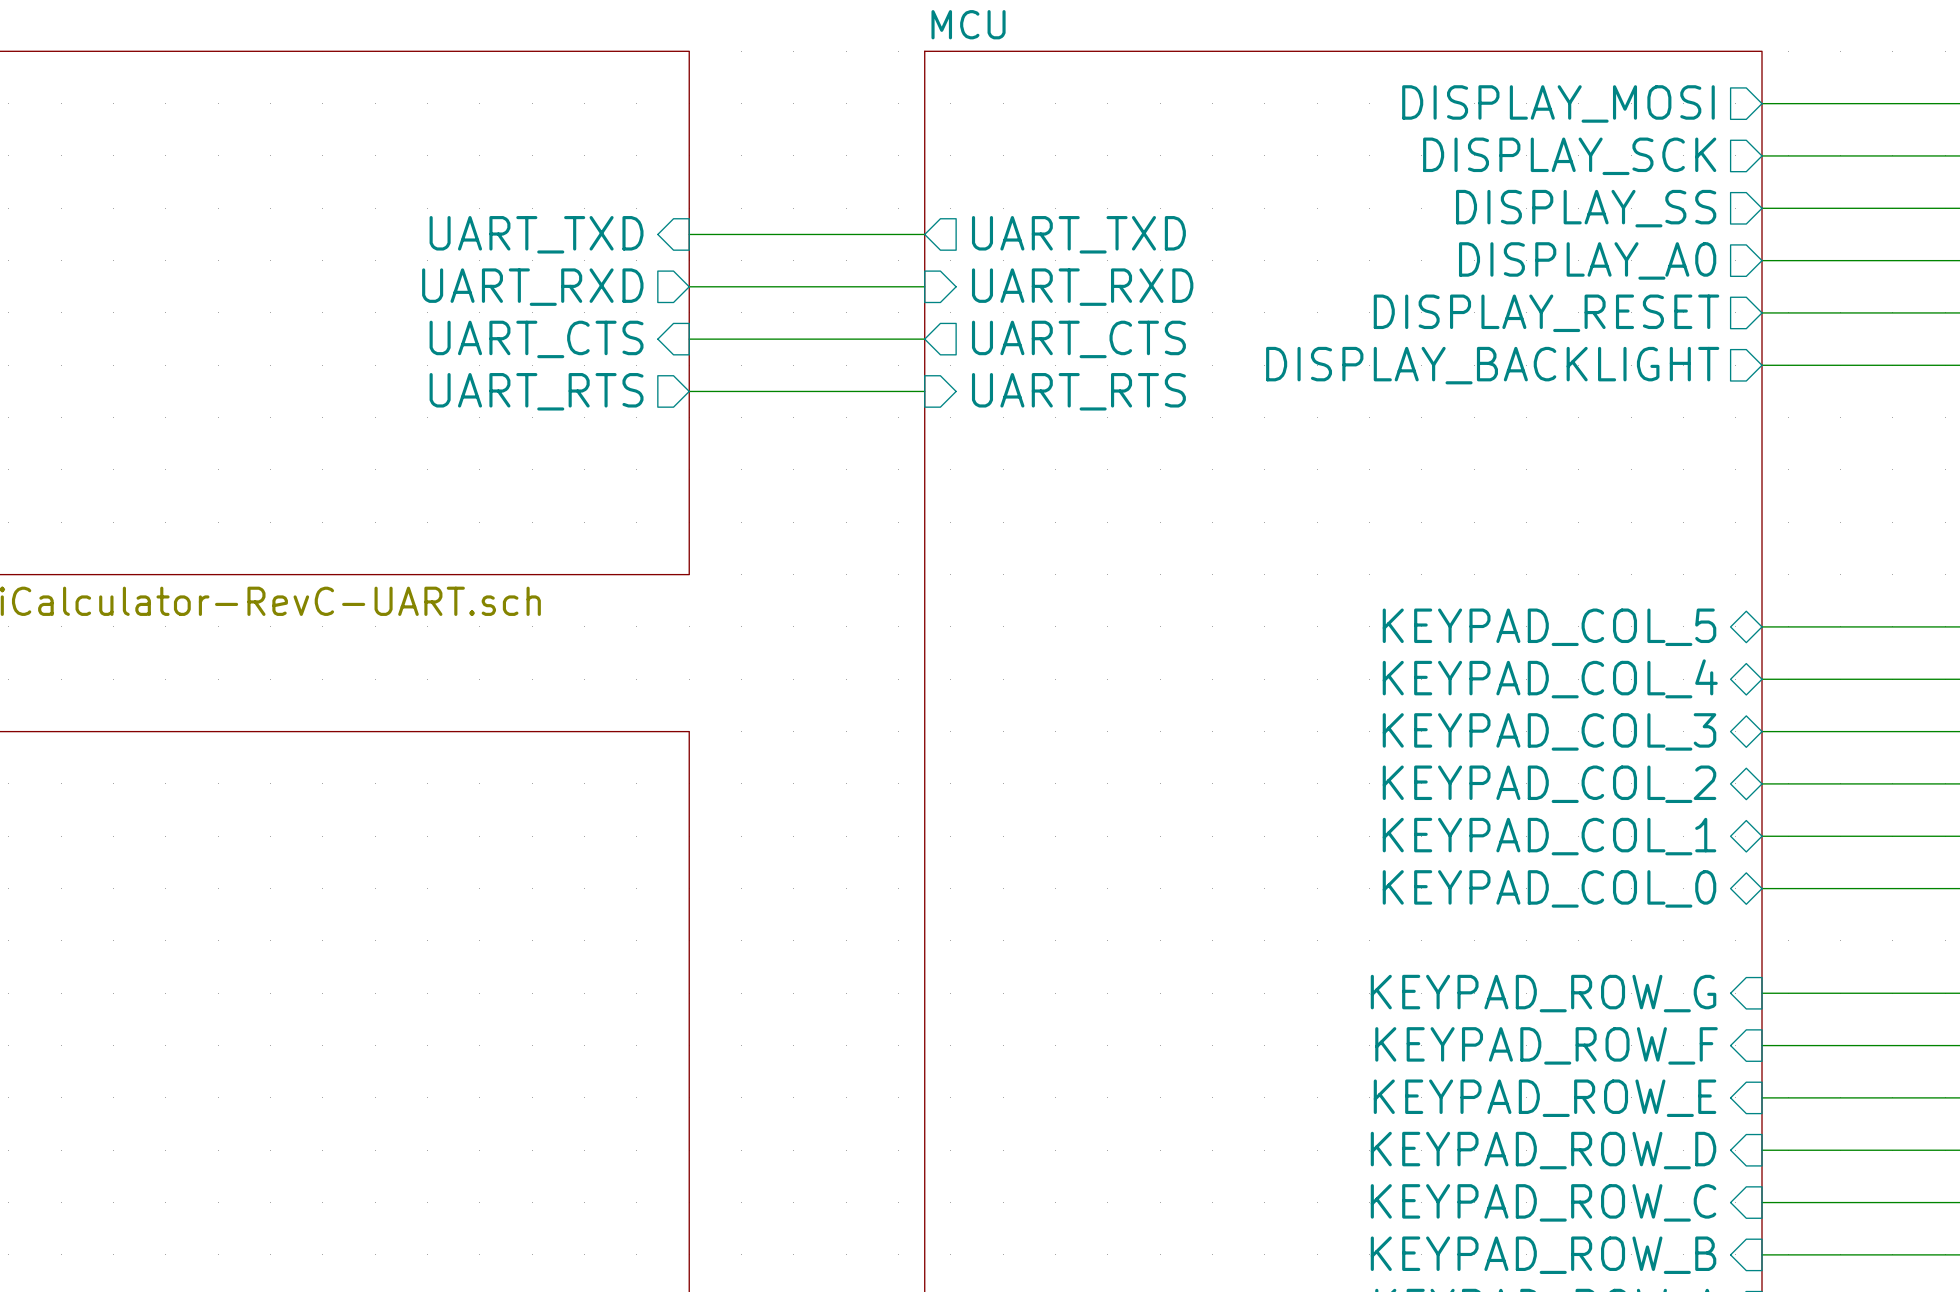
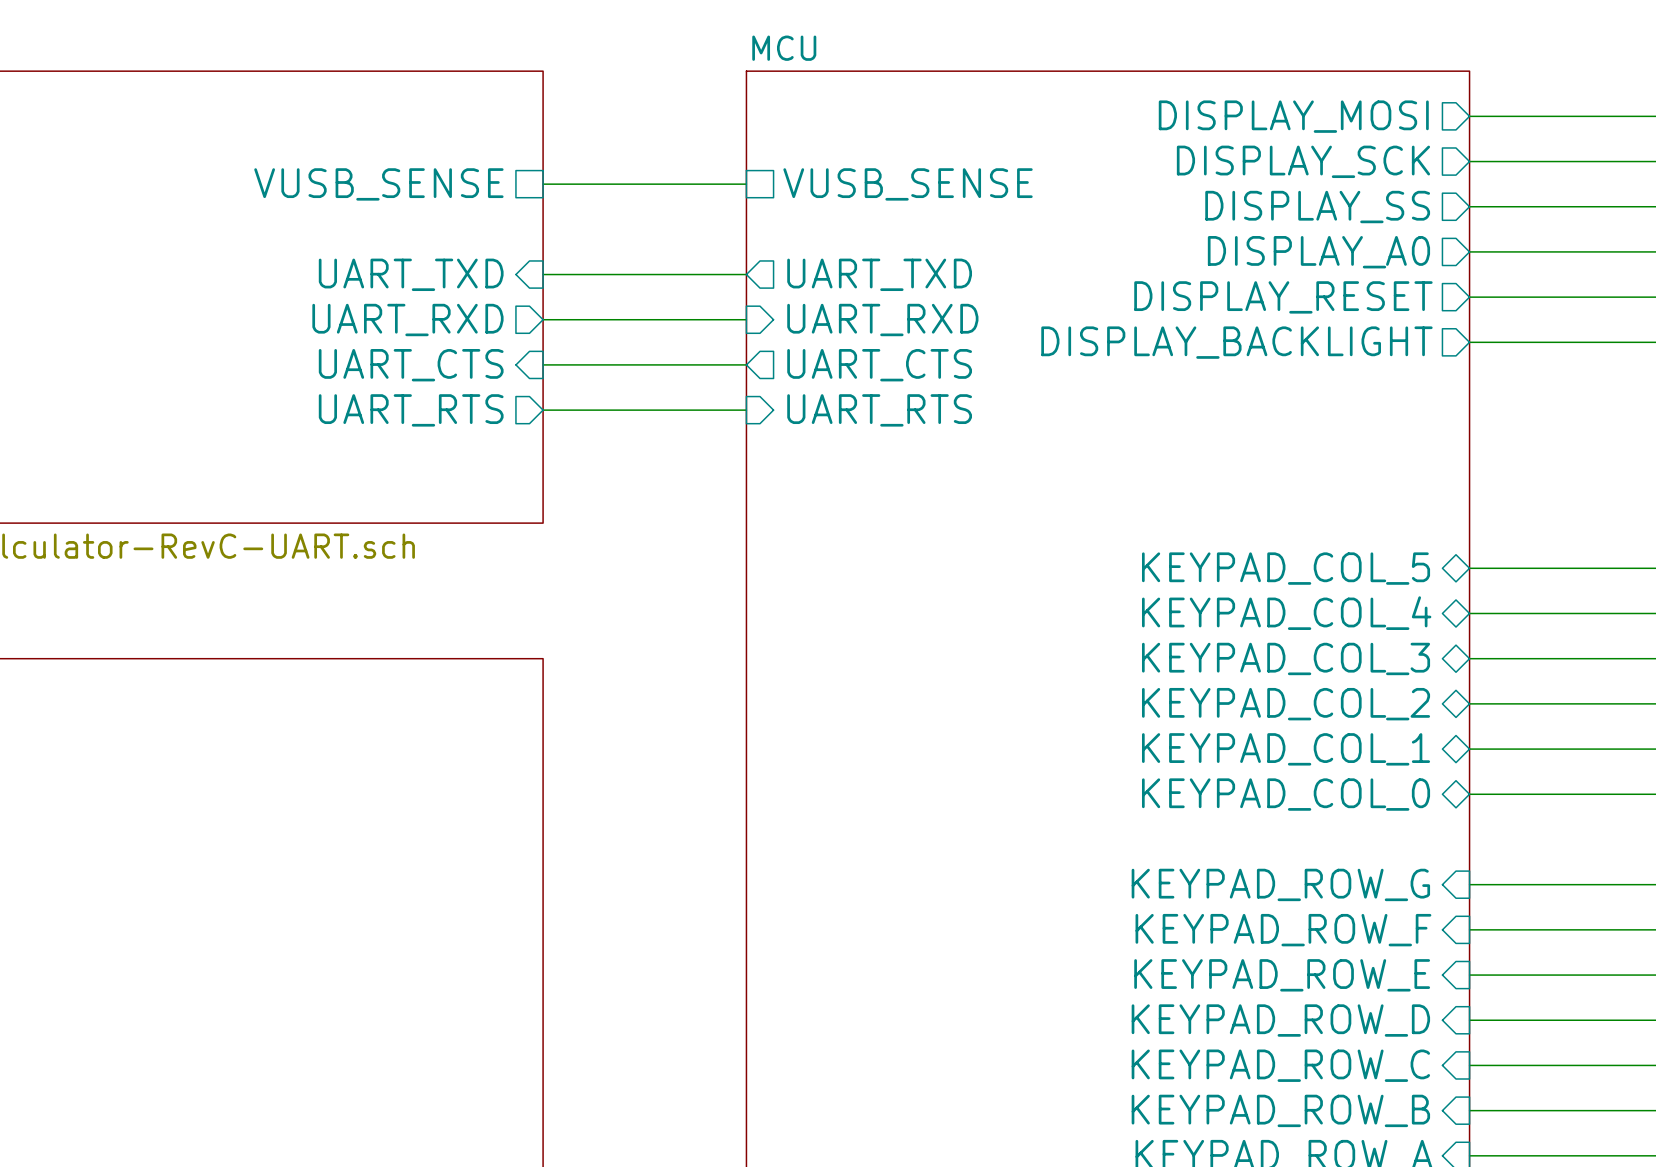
sheet pin: none -> VUSB_SENSE (378, 184)
sheet pin: none -> VUSB_SENSE (908, 184)
sheet pin: UART_TXD (536, 234) -> none
wire: (689, 234) (924, 234) -> (543, 184) (746, 184)
sheet pin: UART_TXD (1078, 234) -> none
sheet pin shape: output (532, 287) -> input (411, 274)
sheet pin: UART_RXD (532, 287) -> UART_TXD (411, 274)
sheet pin shape: input (1082, 287) -> output (879, 274)
sheet pin: UART_RXD (1082, 287) -> UART_TXD (879, 274)
sheet pin shape: input (536, 339) -> output (407, 320)
sheet pin: UART_CTS (536, 339) -> UART_RXD (407, 320)
sheet pin shape: output (1078, 339) -> input (882, 320)
sheet pin: UART_CTS (1078, 339) -> UART_RXD (882, 320)
sheet pin shape: output (536, 391) -> input (411, 365)
sheet pin: UART_RTS (536, 391) -> UART_CTS (411, 365)
sheet pin shape: input (1078, 391) -> output (879, 365)
sheet pin: UART_RTS (1078, 391) -> UART_CTS (879, 365)
wire: none -> (543, 410) (746, 410)
sheet pin: none -> UART_RTS (411, 410)
sheet pin: none -> UART_RTS (879, 410)

